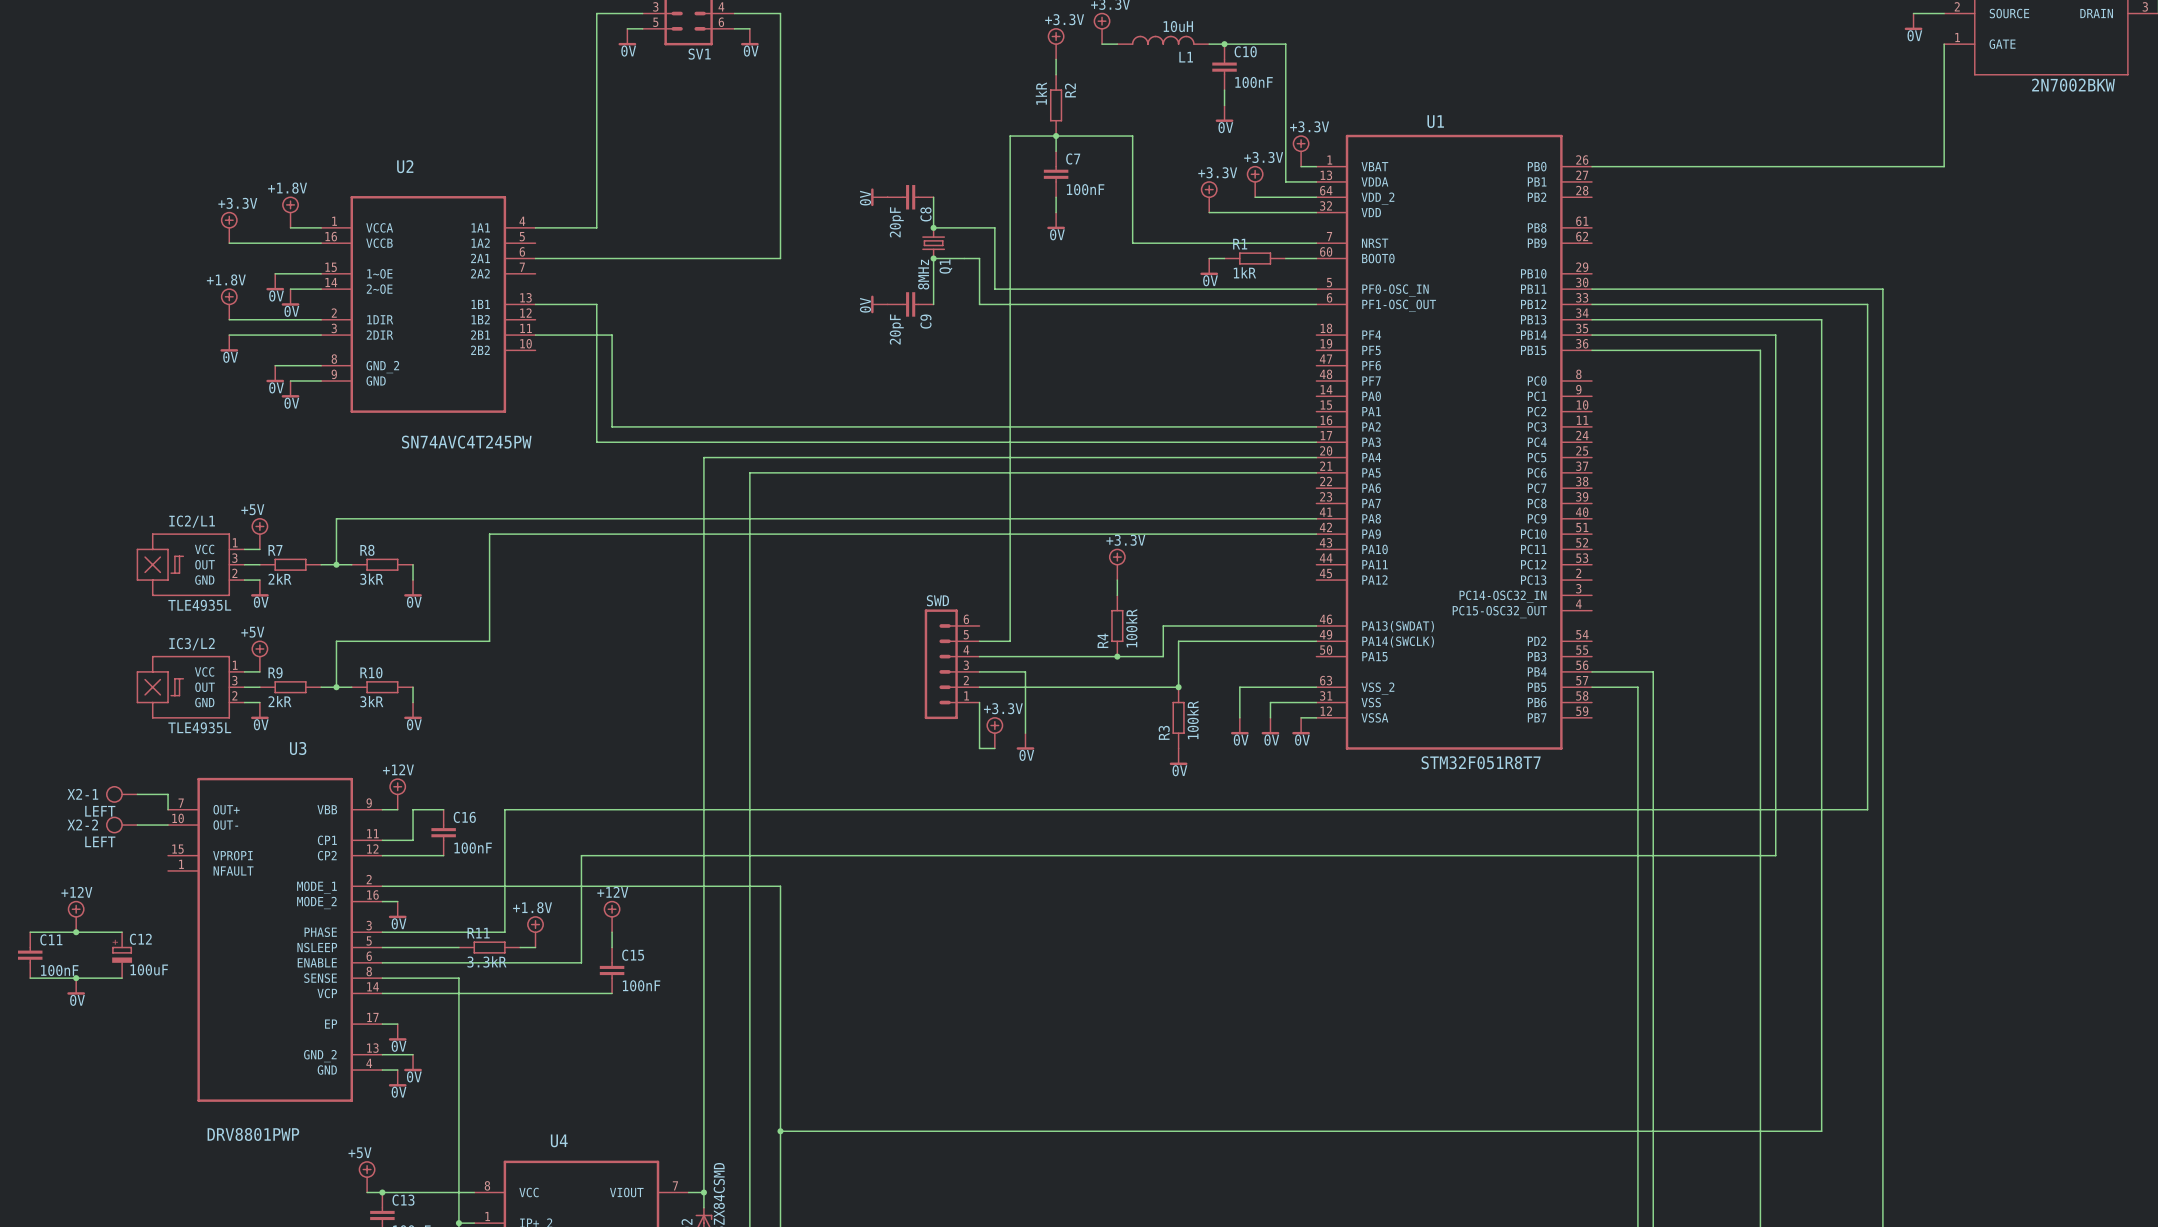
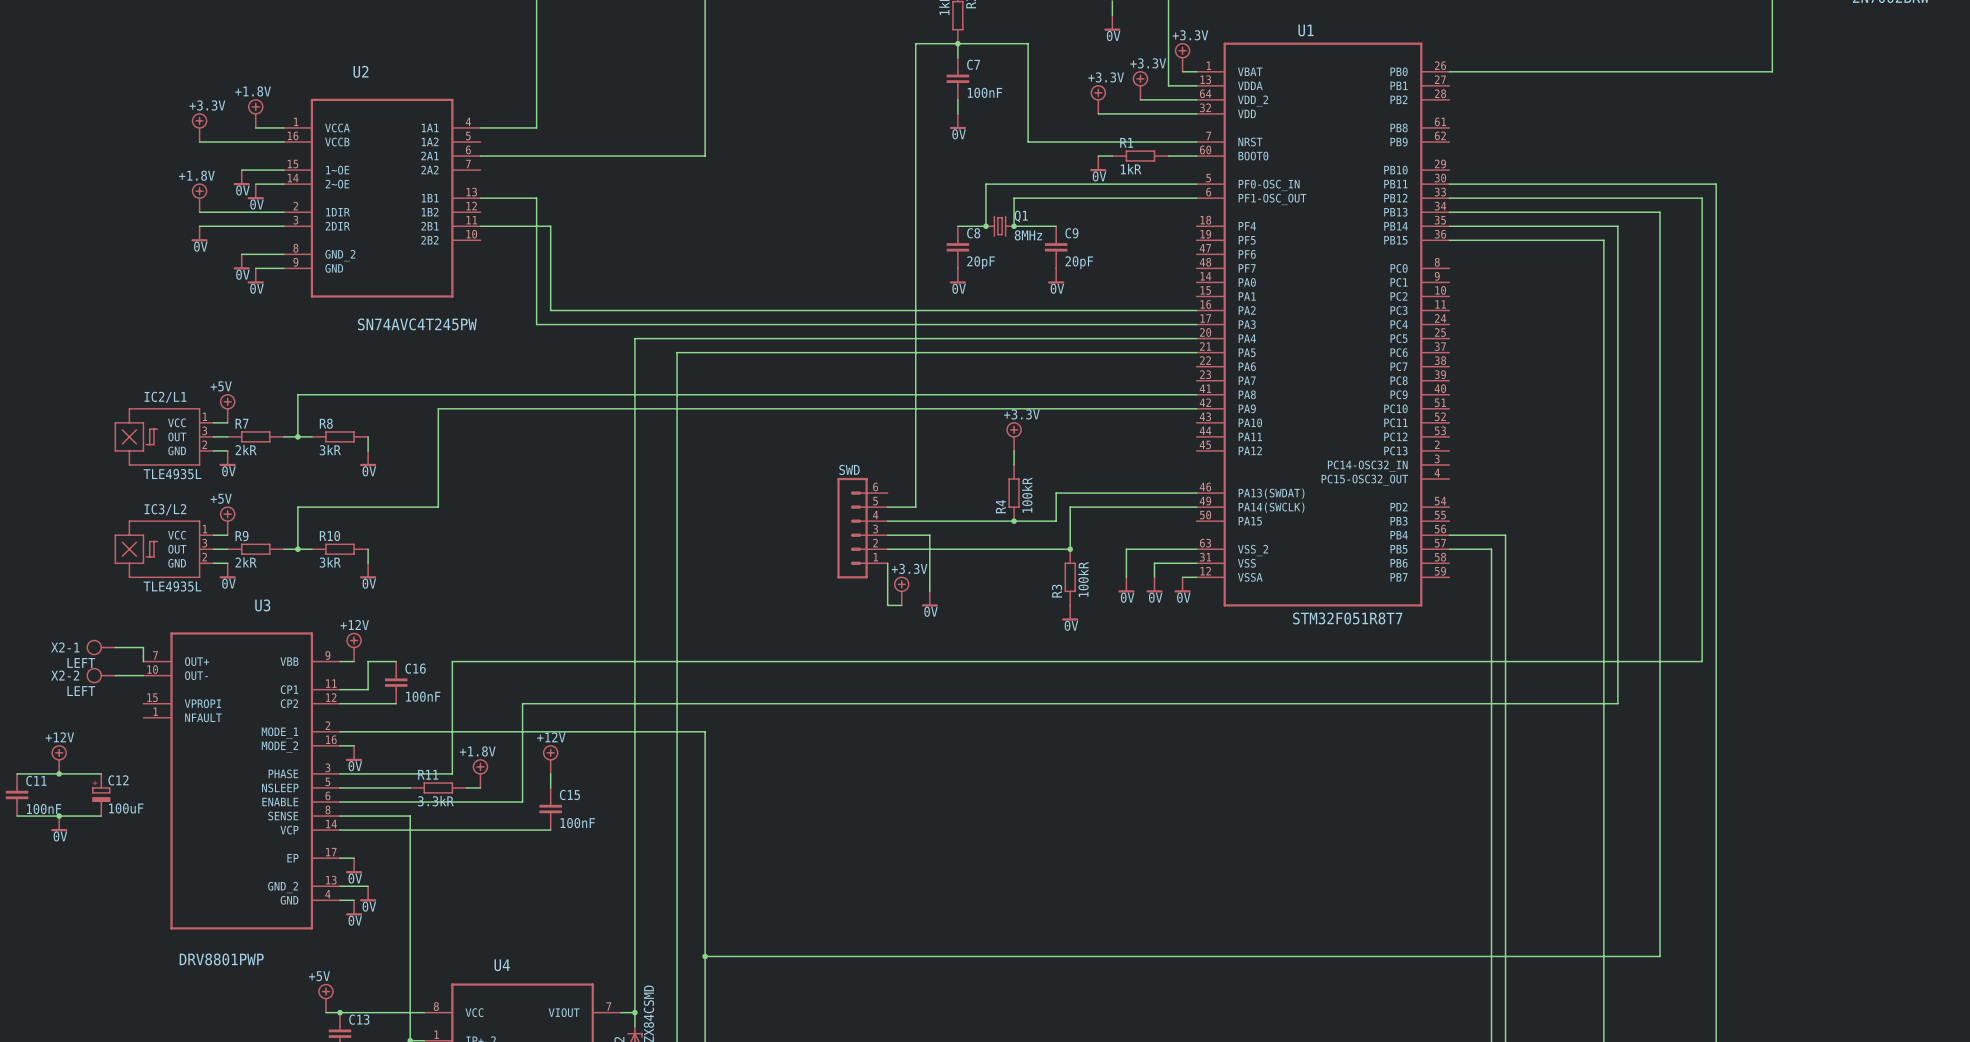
power symbol: 0V (879, 197) -> none
C8 rotation: 0° (910, 197) -> 90° clockwise (957, 247)
C8 position: (910, 197) -> (957, 247)
wire: (933, 197) (933, 227) (994, 227) (994, 289) (1086, 289) -> (957, 226) (985, 226) (985, 184)
C8 name position: C8 (925, 214) -> C8 (973, 233)
C8 value position: 20pF (896, 222) -> 20pF (981, 262)
junction: (933, 227) -> none
Q1 rotation: 0° (933, 243) -> 90° clockwise (1000, 226)
Q1 position: (933, 243) -> (1000, 226)
junction: (933, 258) -> none
Q1 name position: Q1 (945, 266) -> Q1 (1021, 216)
Q1 value position: 8MHz (923, 274) -> 8MHz (1028, 235)
power symbol: 0V (879, 304) -> none
C9 rotation: 0° (910, 304) -> 90° clockwise (1056, 247)
C9 position: (910, 304) -> (1056, 247)
wire: (933, 304) (933, 258) (979, 258) (979, 304) (1117, 304) -> (1056, 226) (1014, 226) (1014, 198)
C9 name position: C9 (925, 321) -> C9 (1071, 233)
C9 value position: 20pF (896, 329) -> 20pF (1079, 262)
junction: none -> (985, 226)
junction: none -> (1014, 226)
power symbol: none -> 0V (957, 275)
power symbol: none -> 0V (1056, 275)

